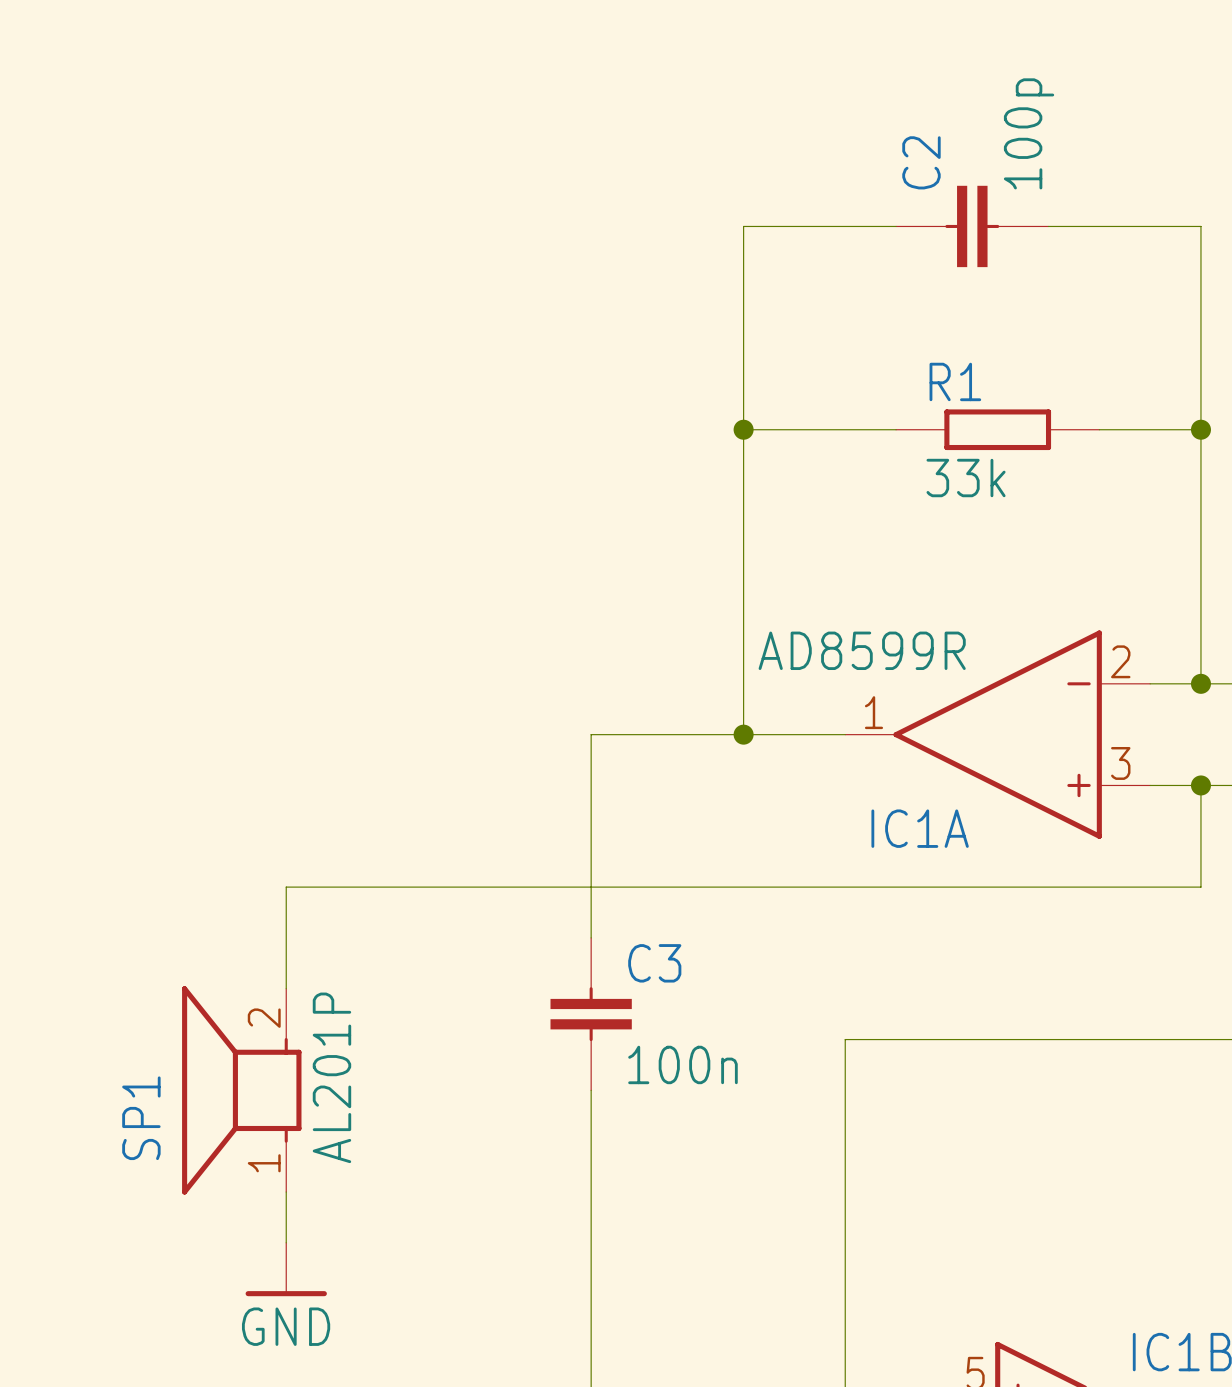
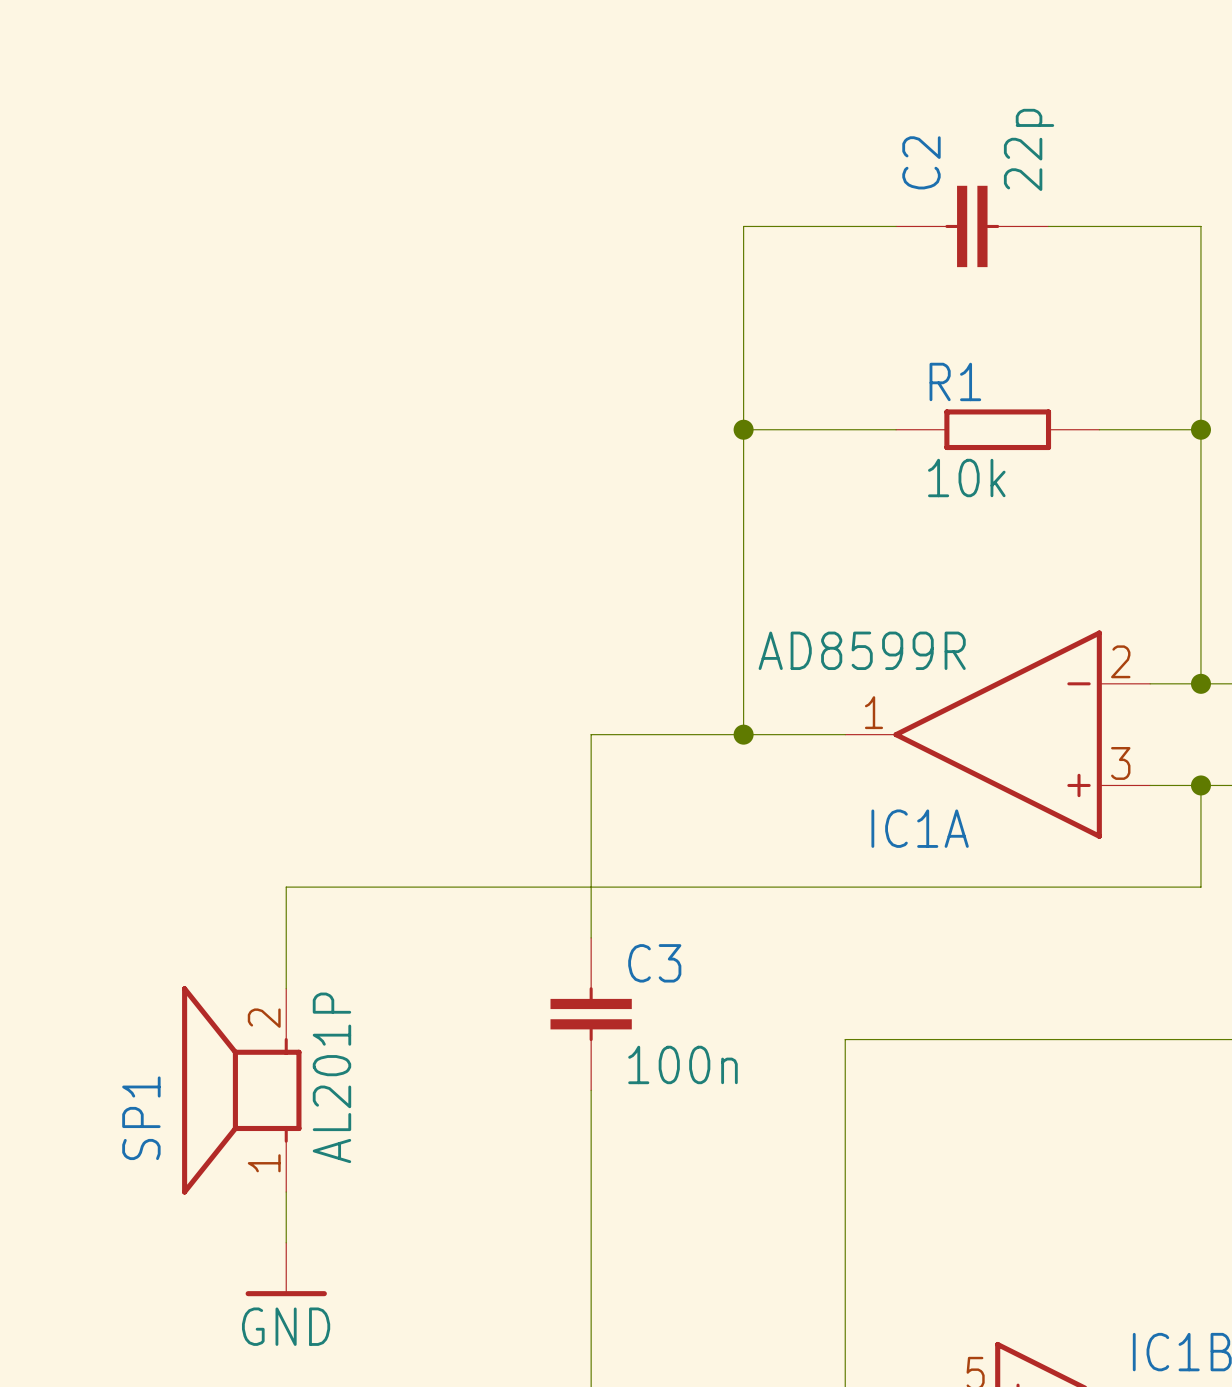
C2 value: 100p (1029, 133) -> 22p (1029, 149)
R1 value: 33k (966, 478) -> 10k (966, 478)

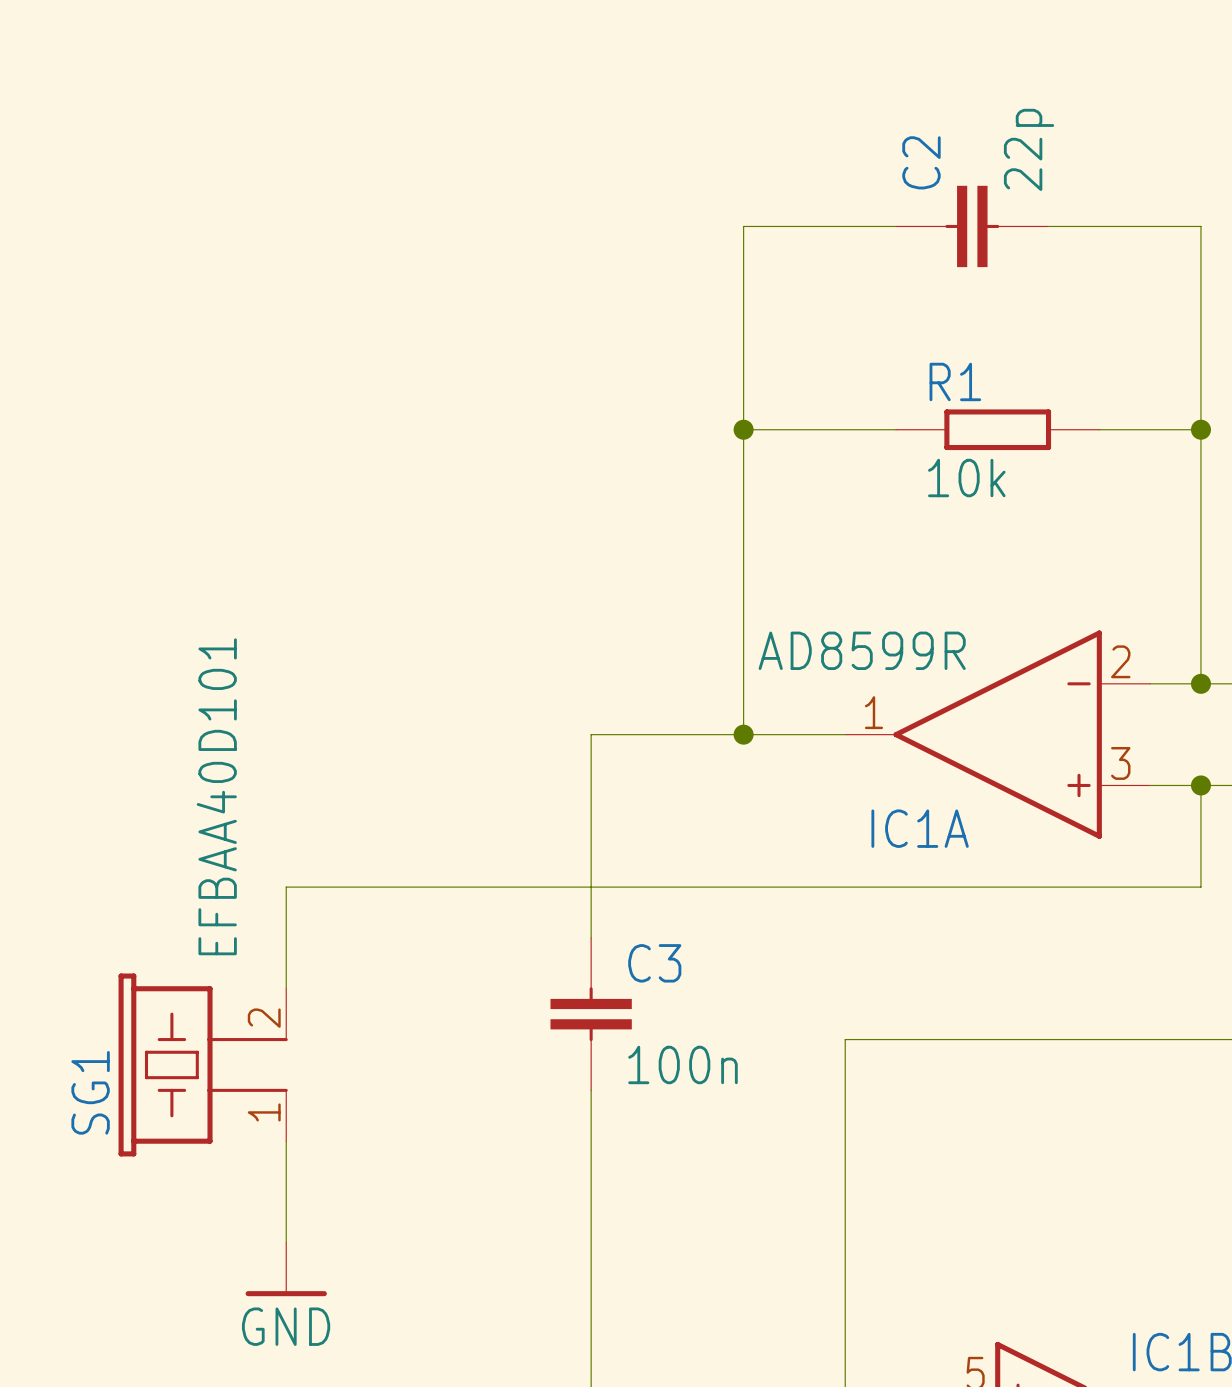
SG1: none -> EFBAA40D101 (203, 1064)
SP1: AL201P (241, 1090) -> none

